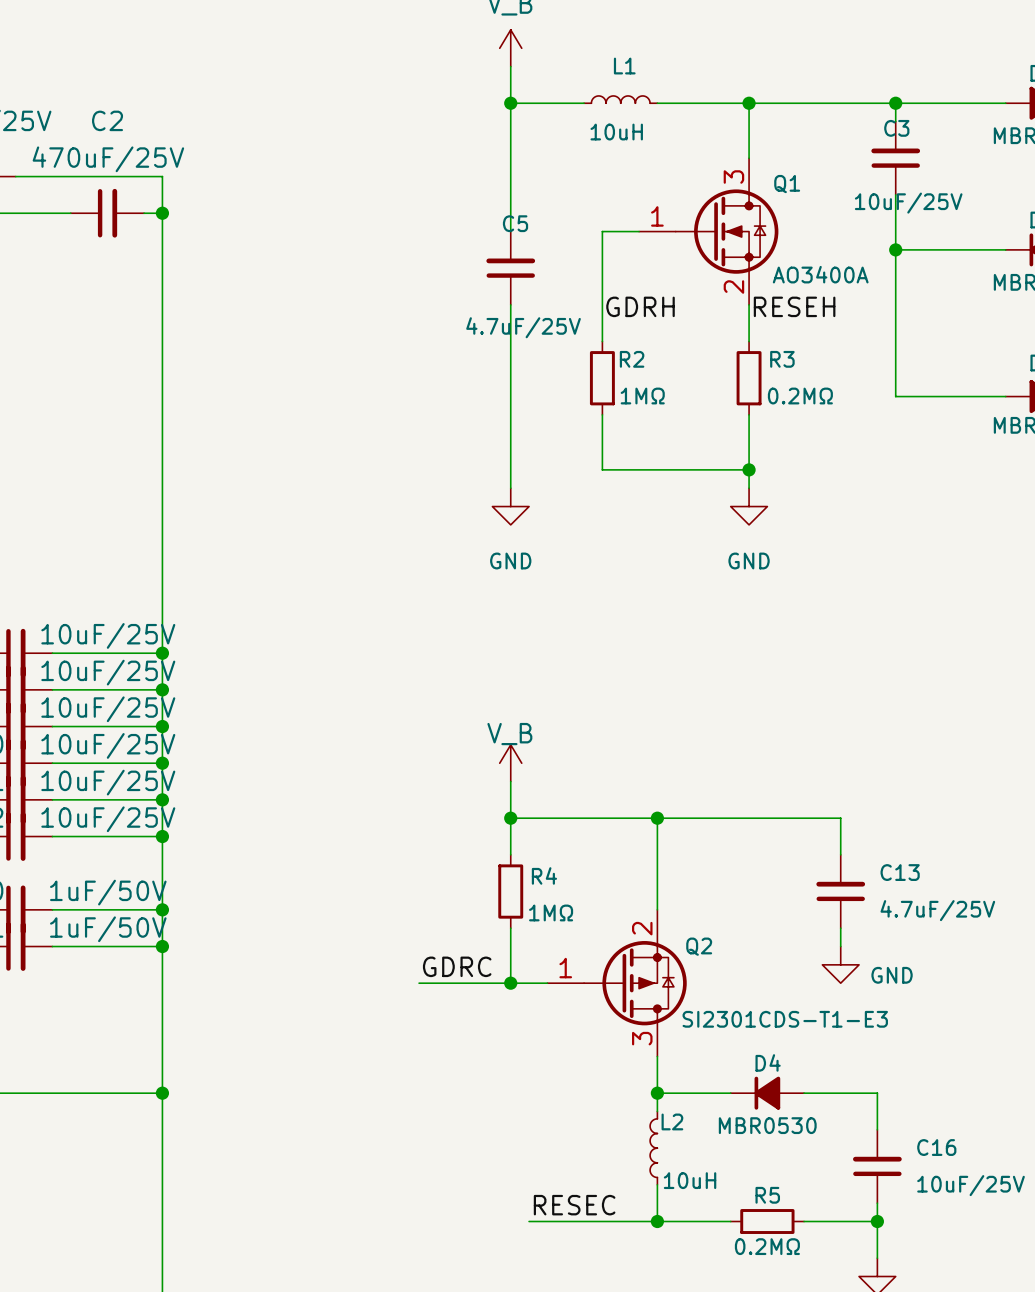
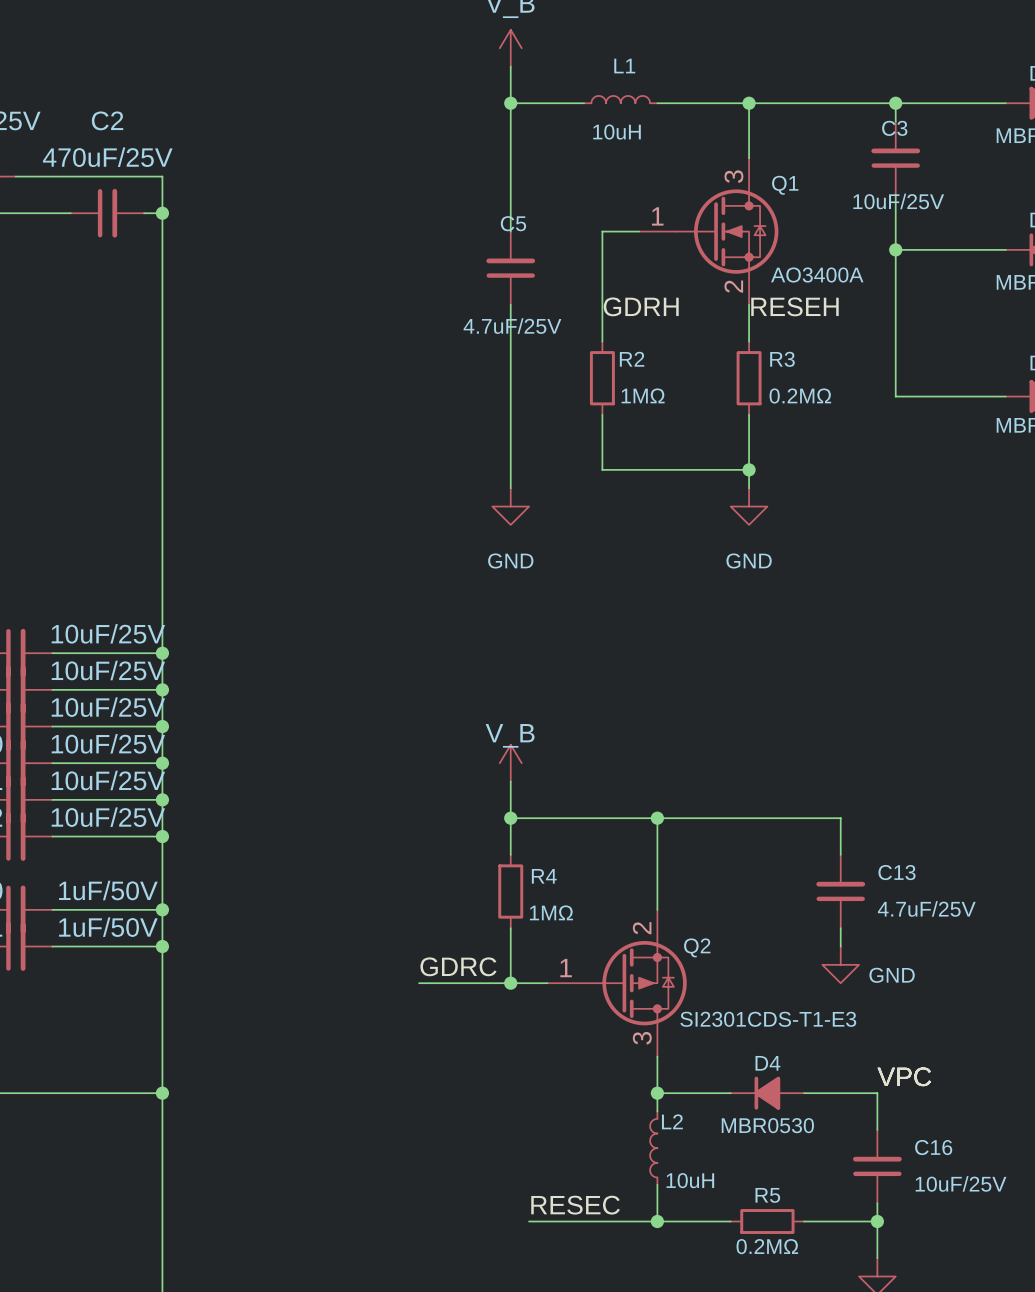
label: none -> VPC (904, 1076)

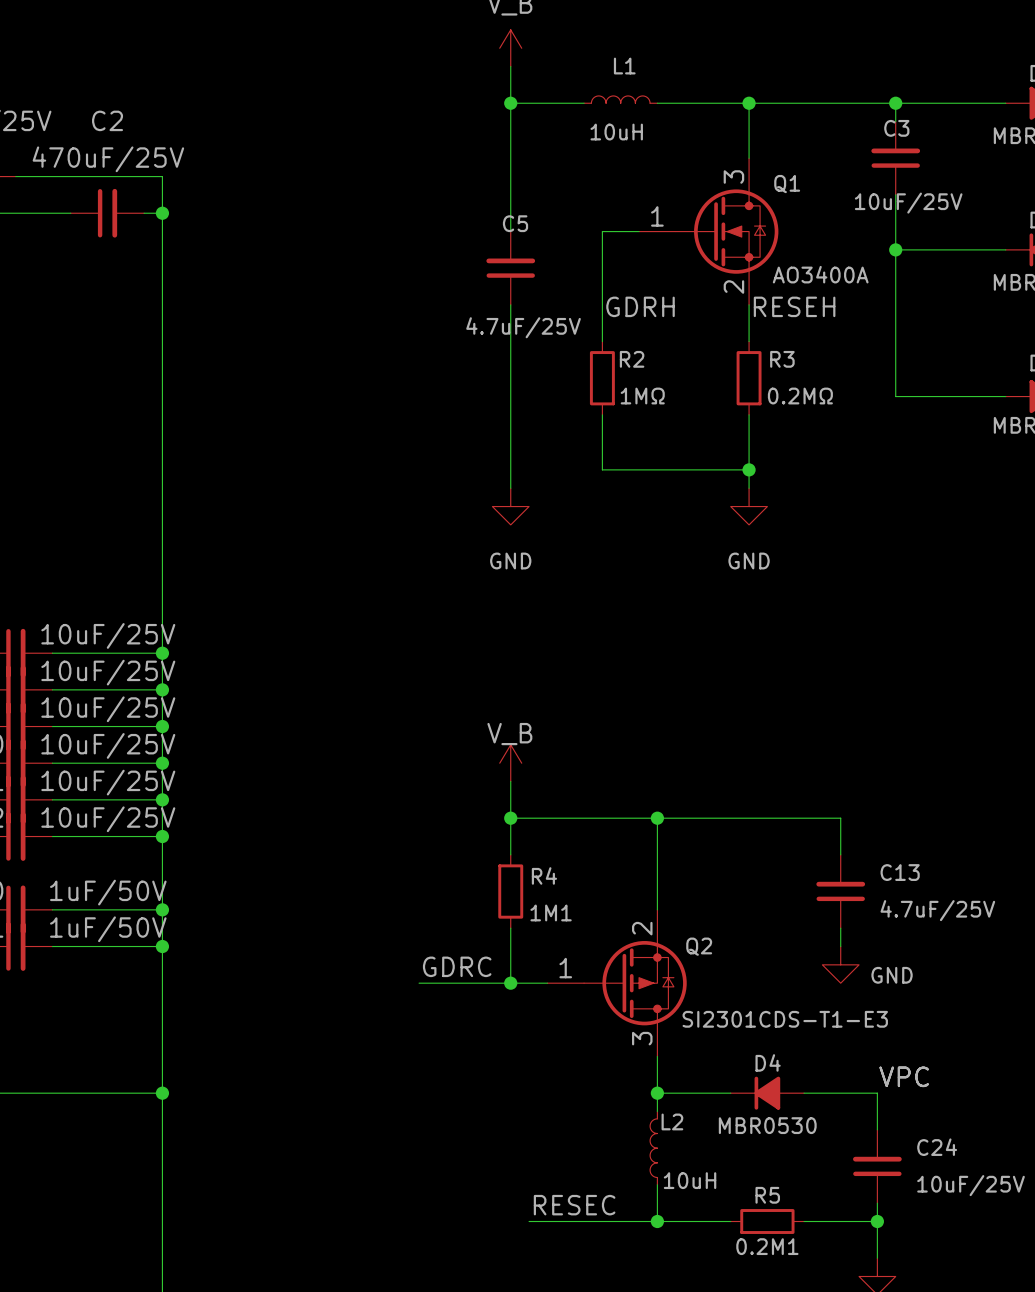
1MΩ name: 1MΩ (551, 912) -> 1M1 (551, 912)
C16 name: C16 (933, 1147) -> C24 (937, 1147)
0.2MΩ name: 0.2MΩ (767, 1246) -> 0.2M1 (767, 1246)

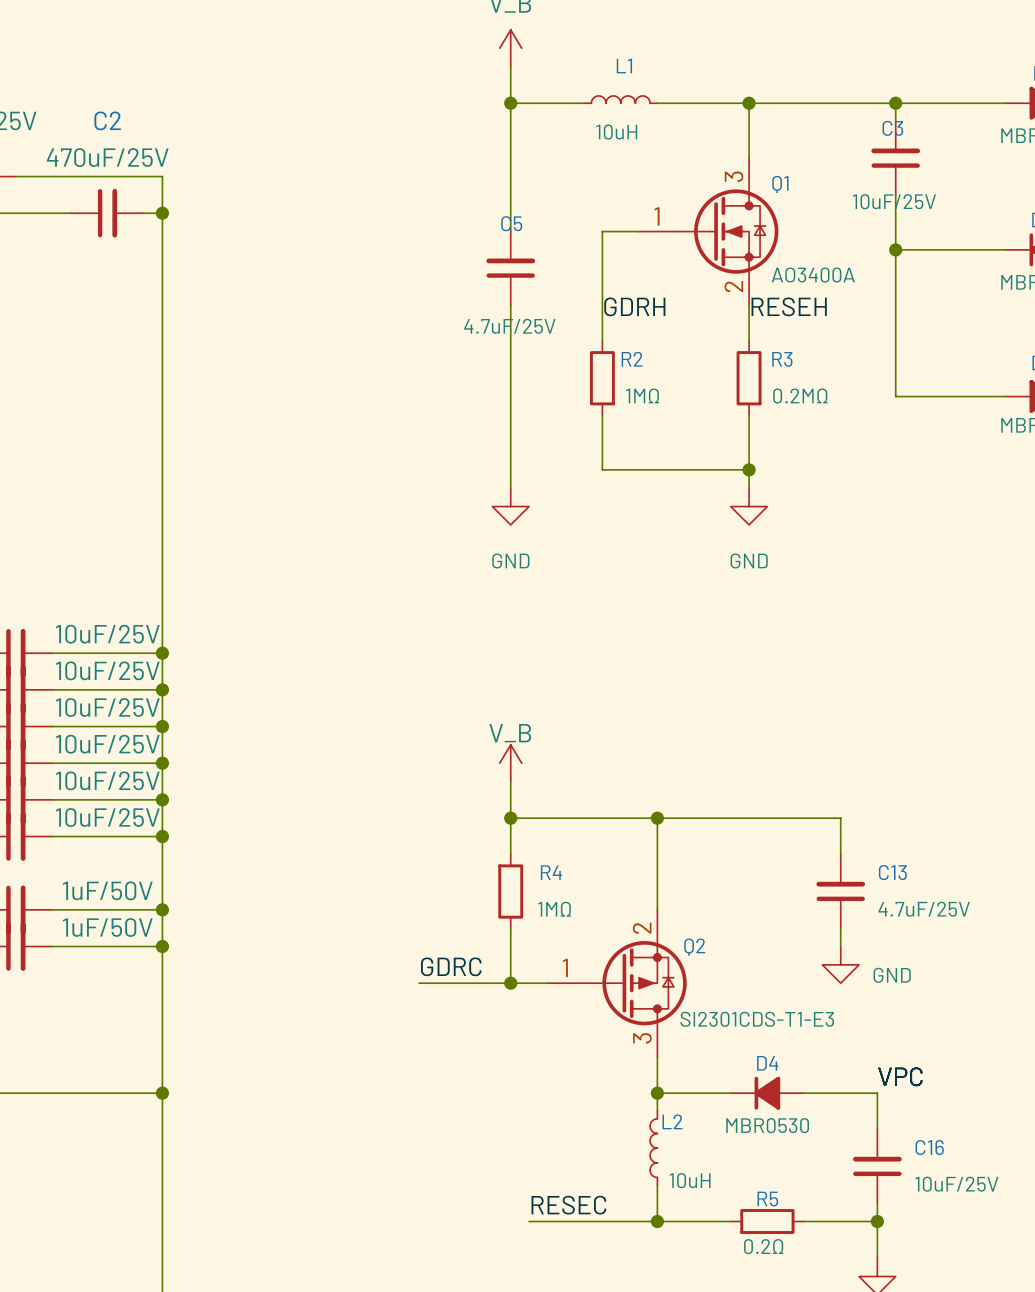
1M1 value: R4 (544, 875) -> 1MΩ (554, 909)
1M1 name: 1M1 (551, 912) -> R4 (551, 872)
C24 name: C24 (937, 1147) -> C16 (929, 1147)
0.2M1 value: R5 (767, 1195) -> 0.2Ω (763, 1246)
0.2M1 name: 0.2M1 (767, 1246) -> R5 (767, 1199)

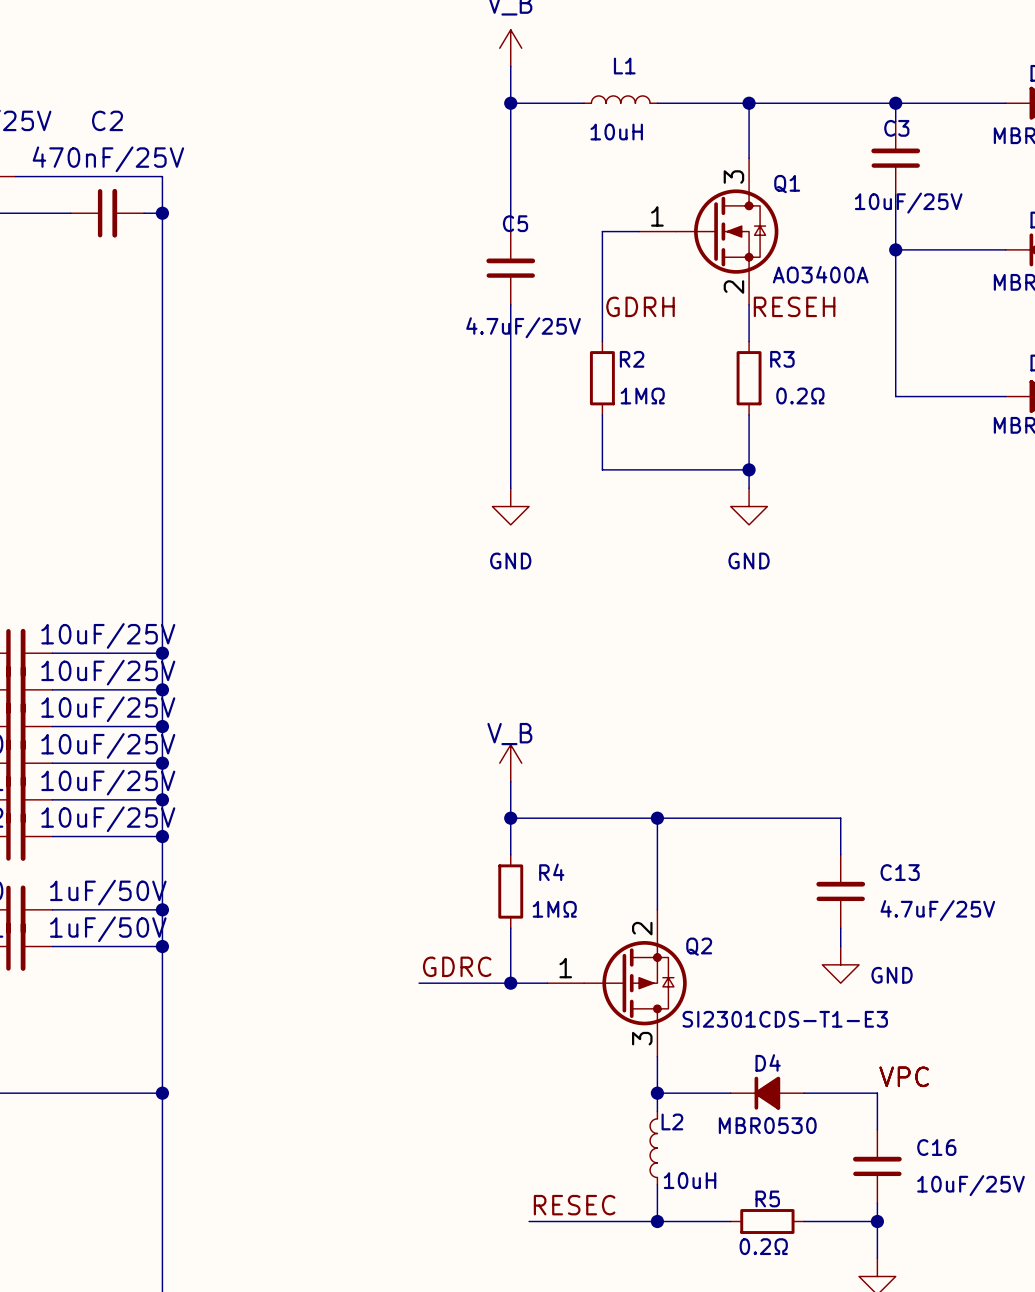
C2 value: 470uF/25V (107, 157) -> 470nF/25V (108, 159)
R3 value: 0.2MΩ (800, 396) -> 0.2Ω (800, 396)

